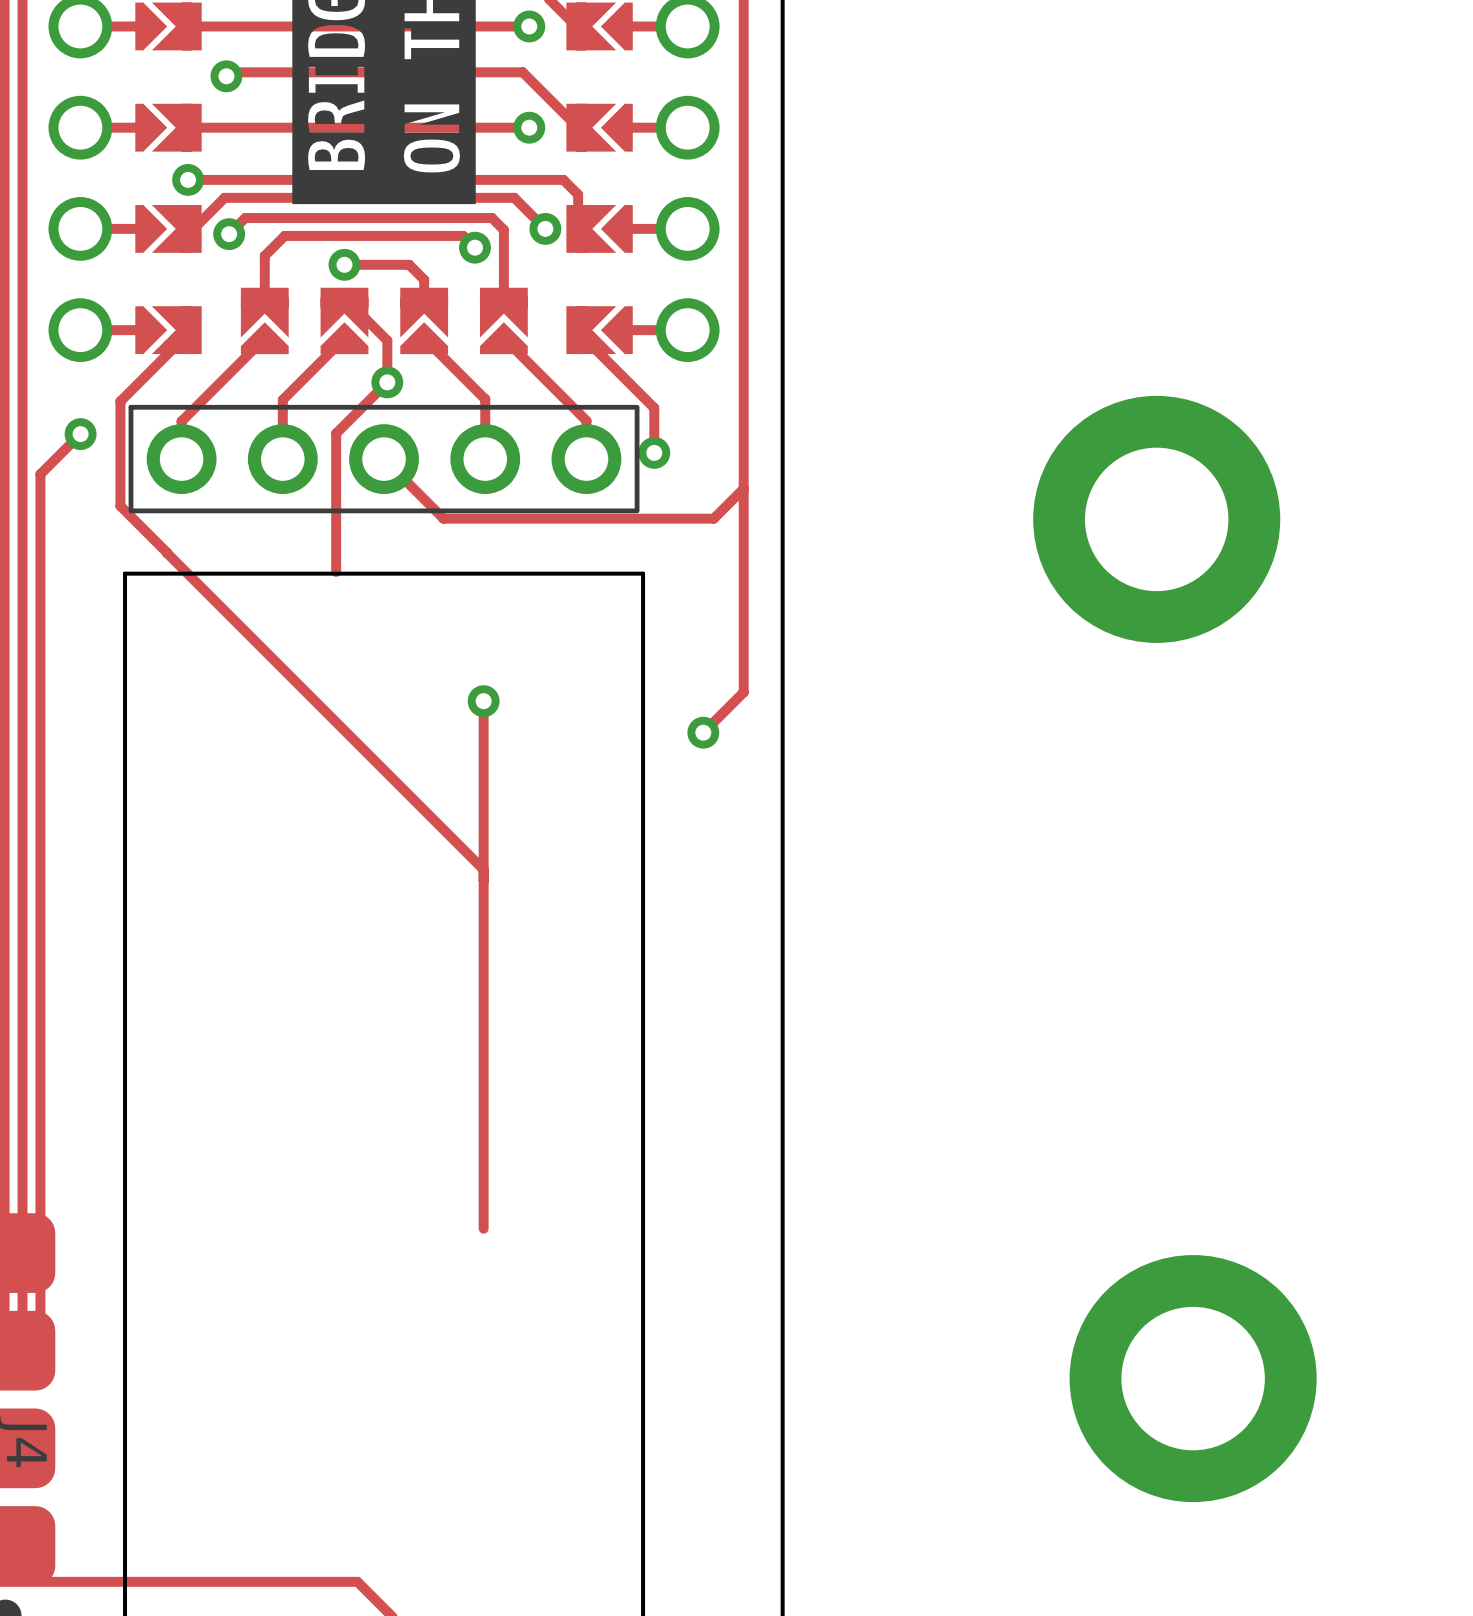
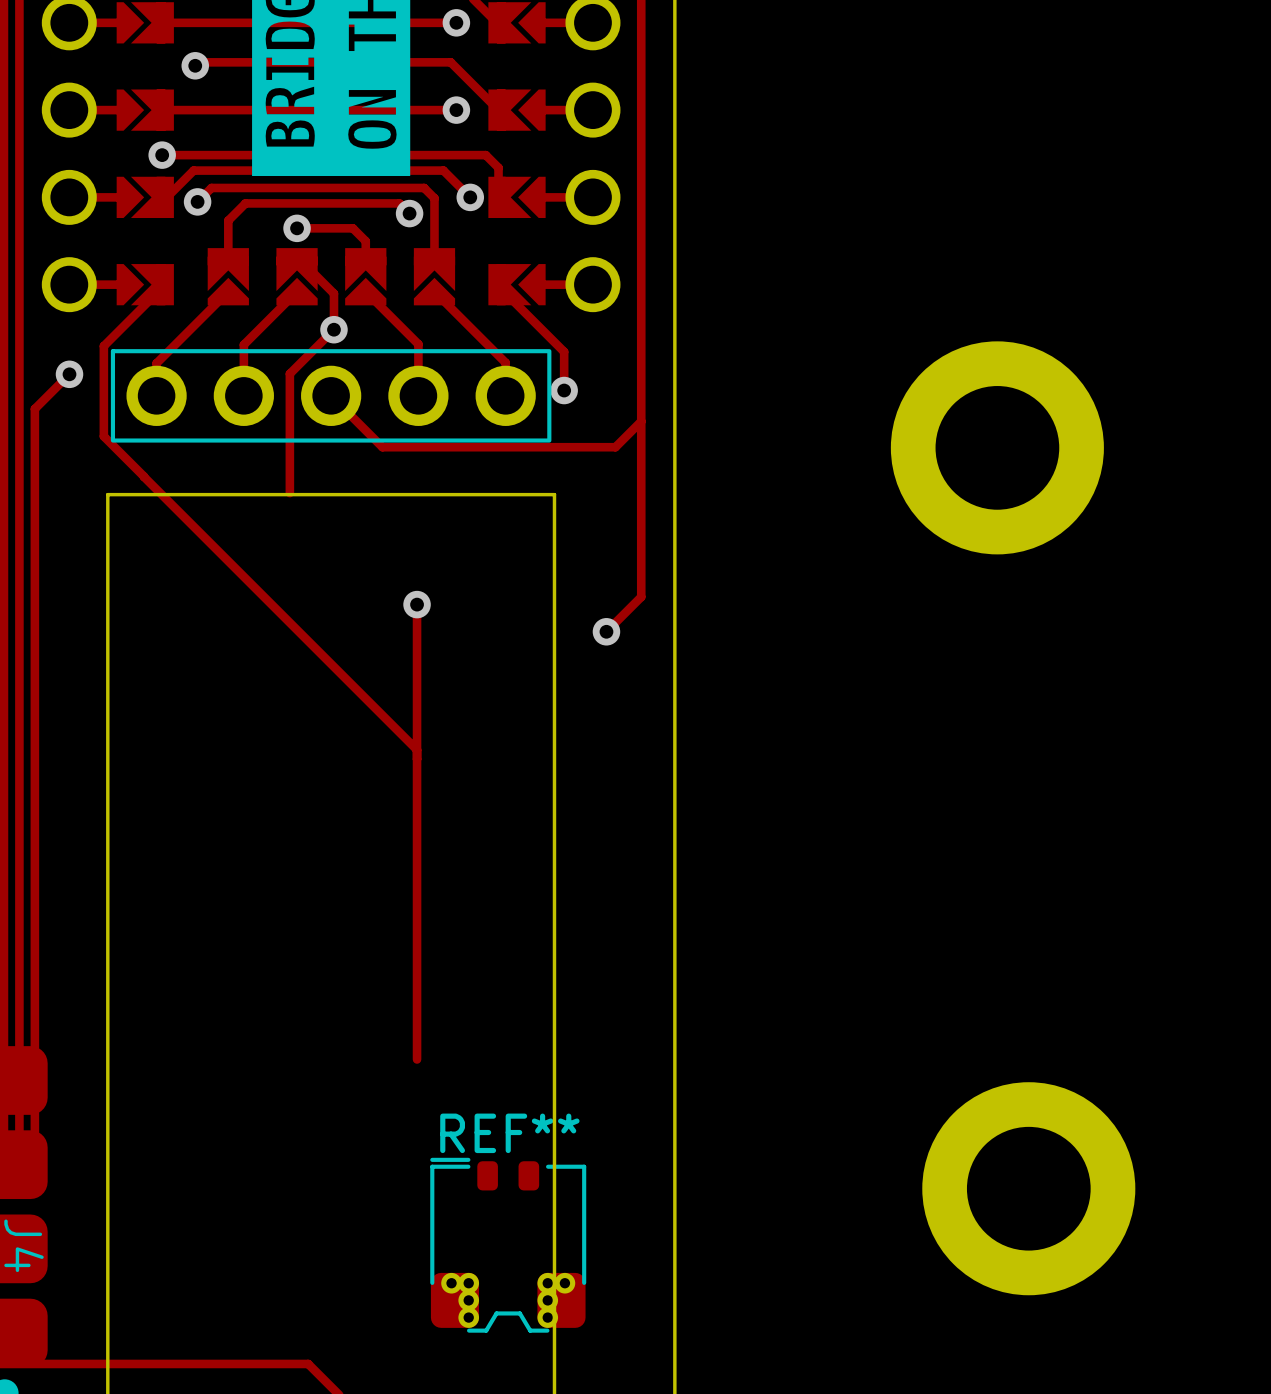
REF**: none -> (508, 1245)

